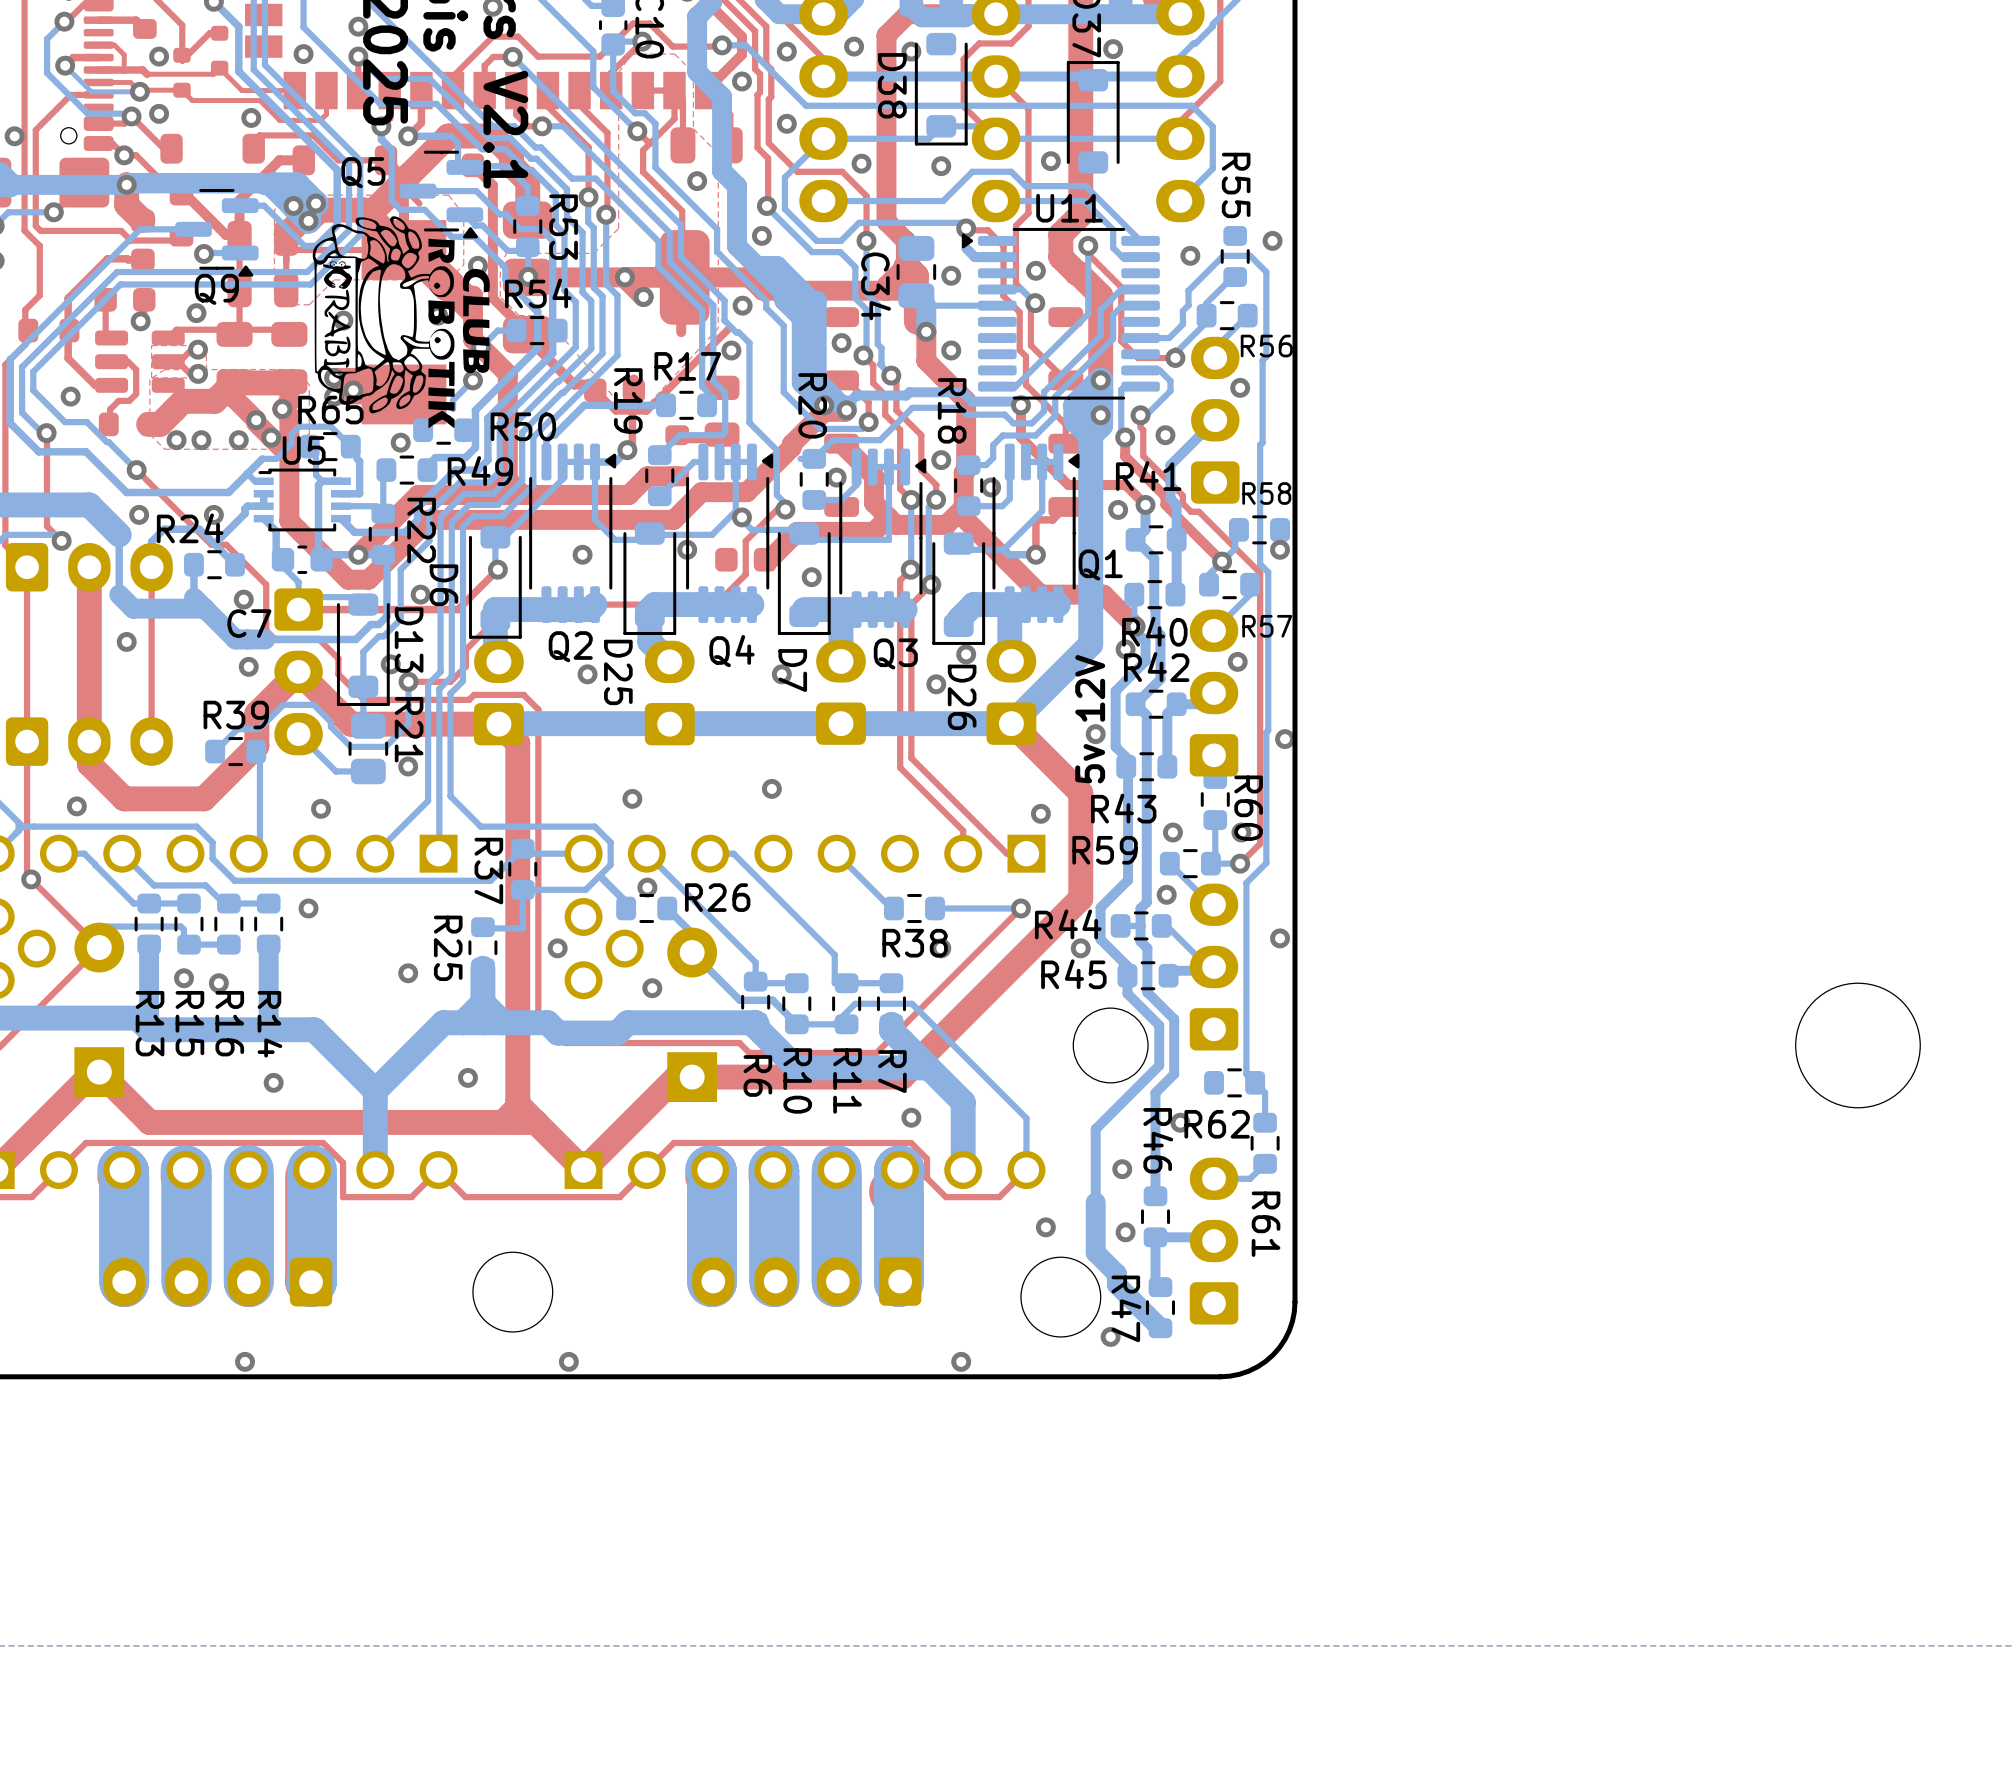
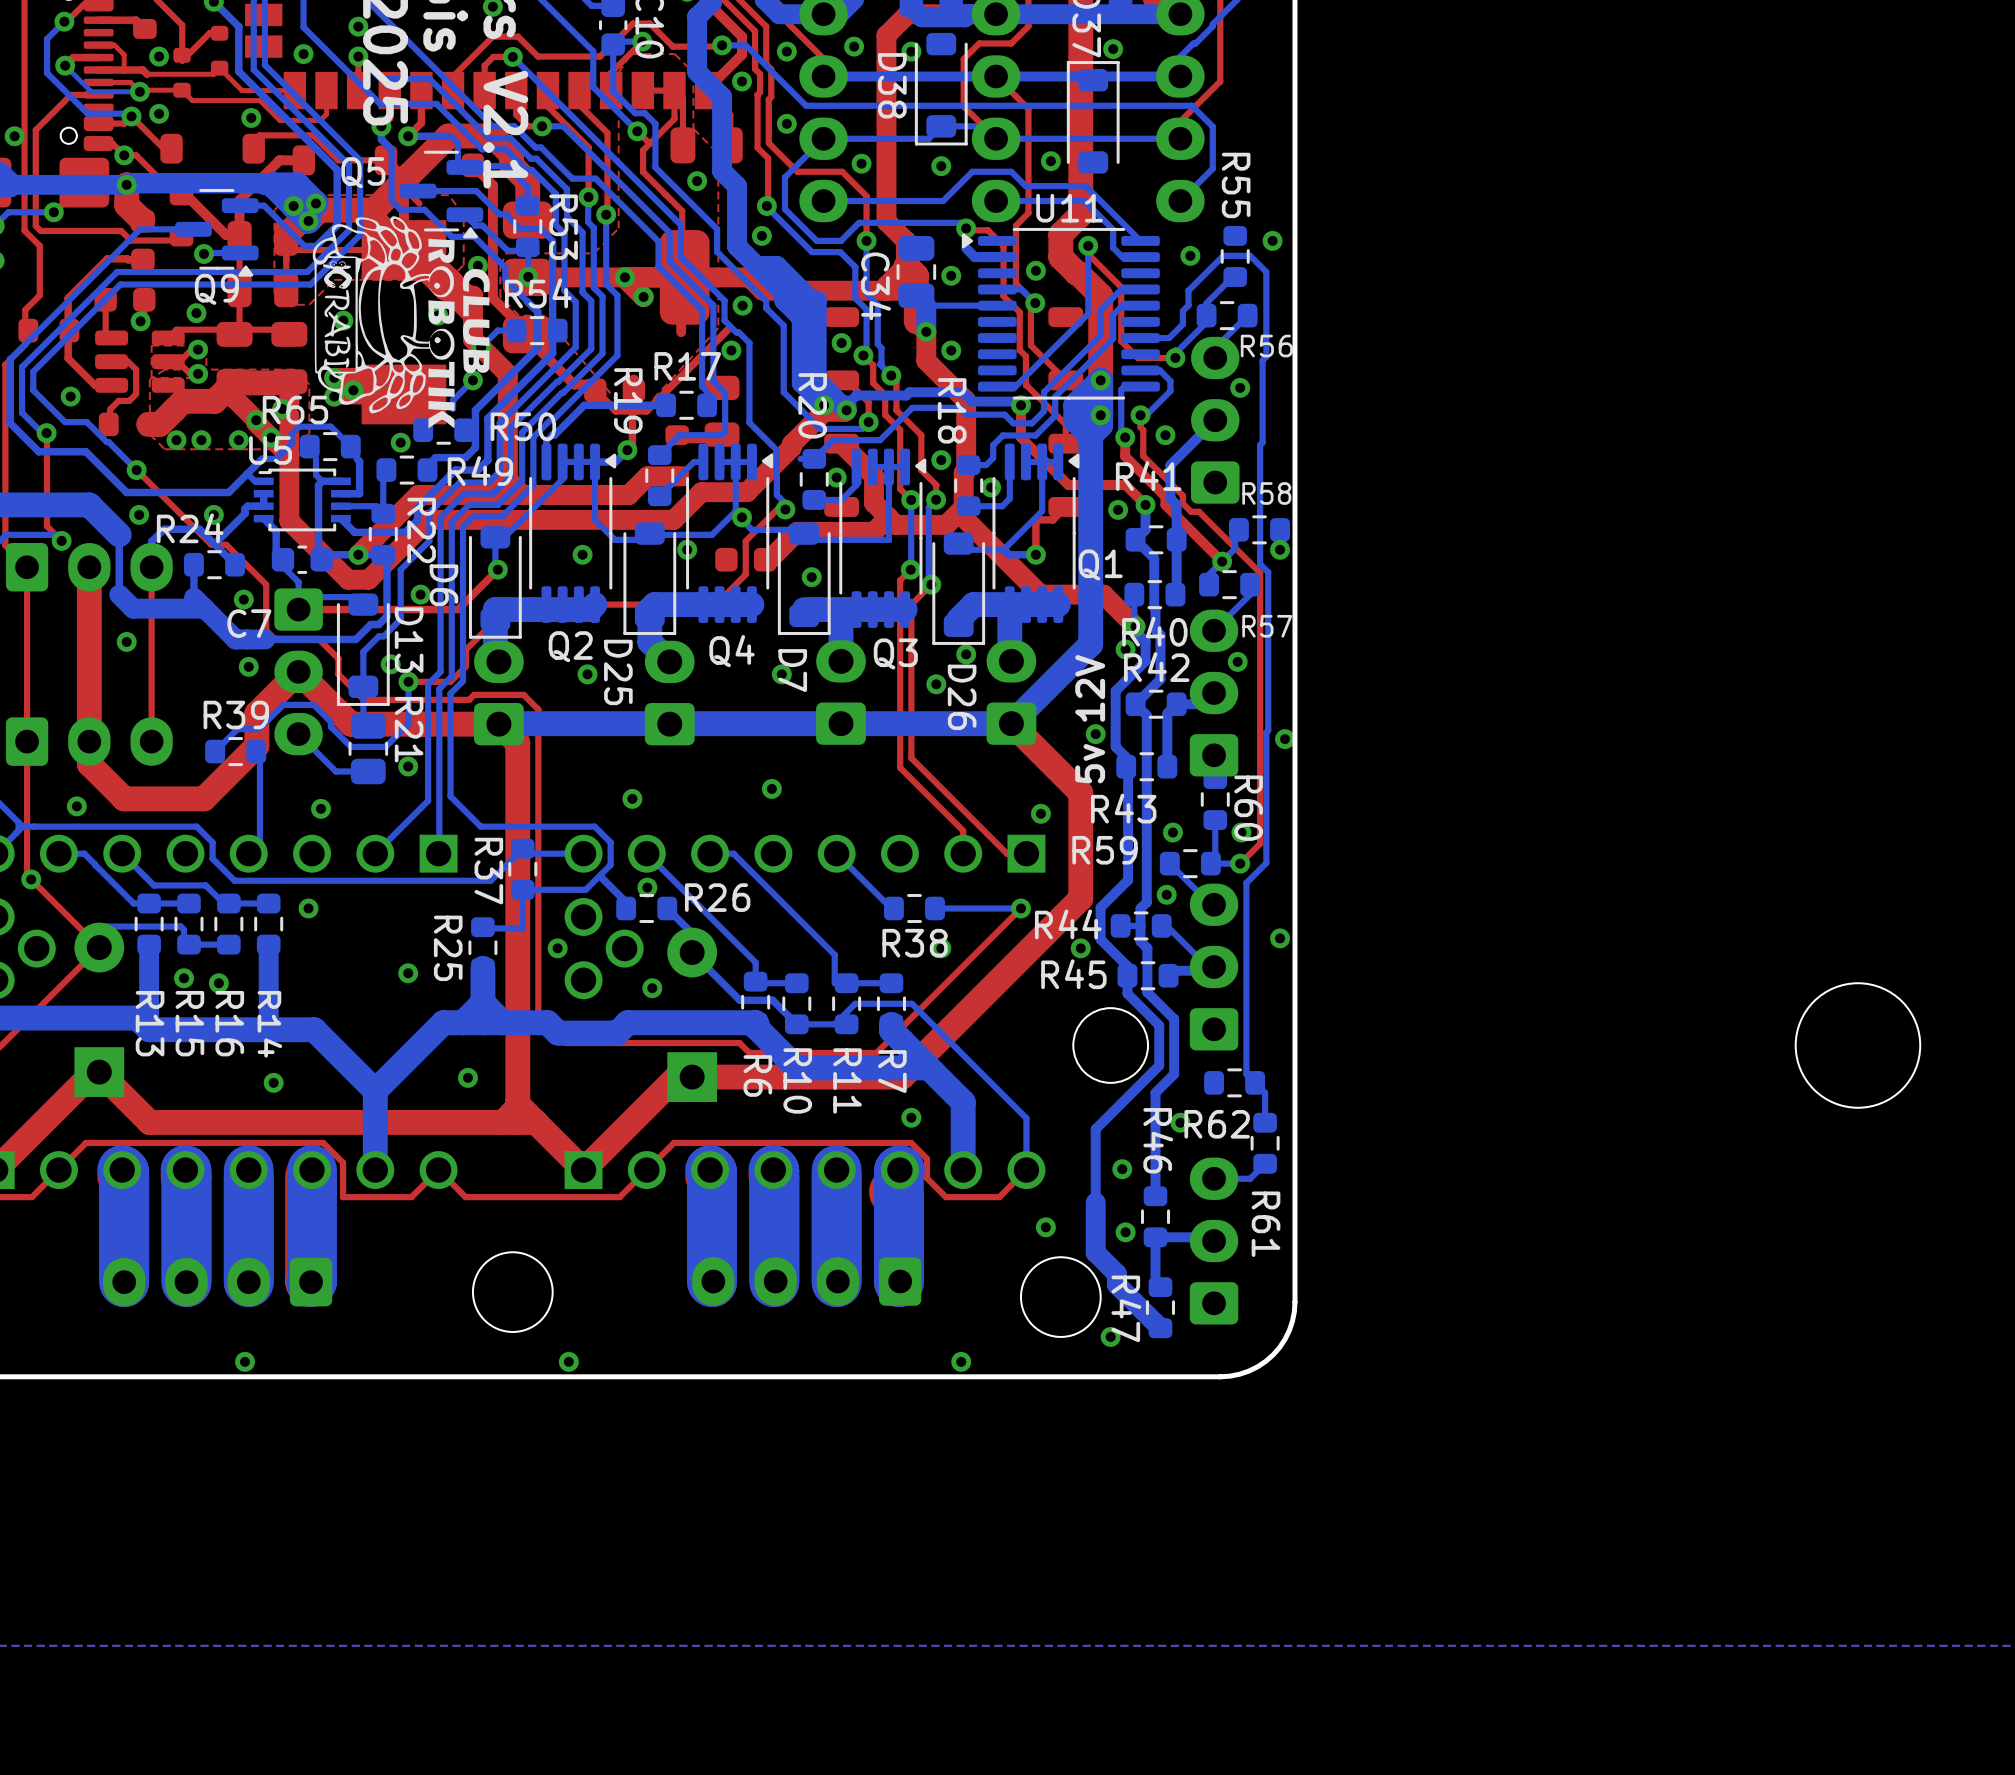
R65 name position: R65 (330, 410) -> R65 (295, 410)
U5 name position: U5 (304, 450) -> U5 (270, 450)

